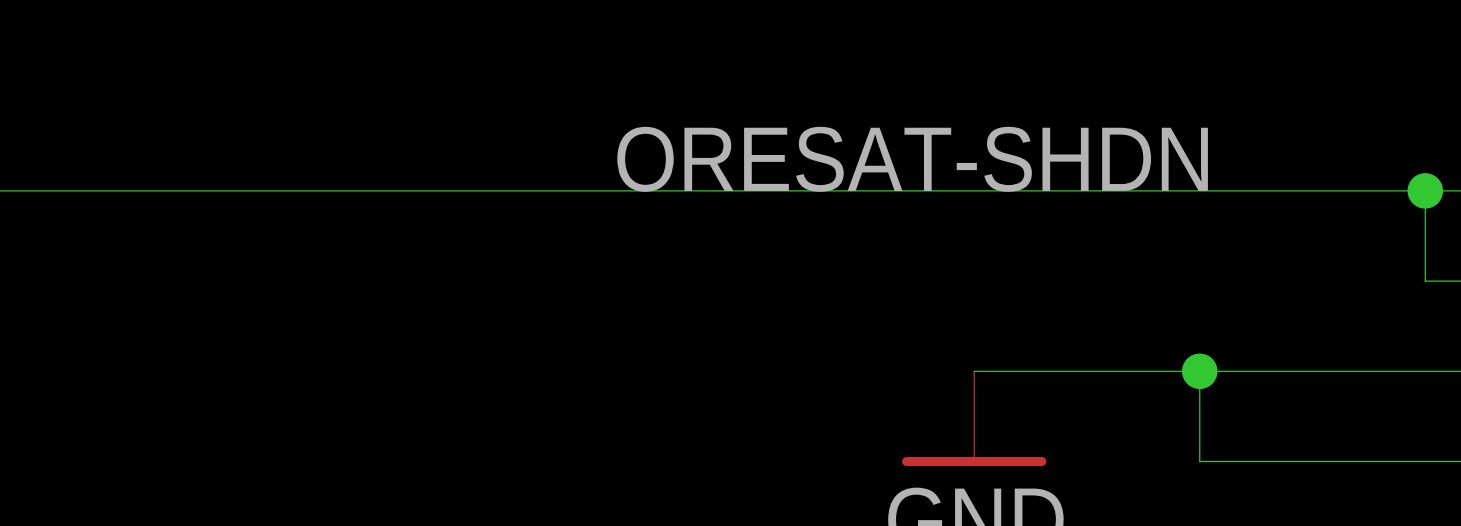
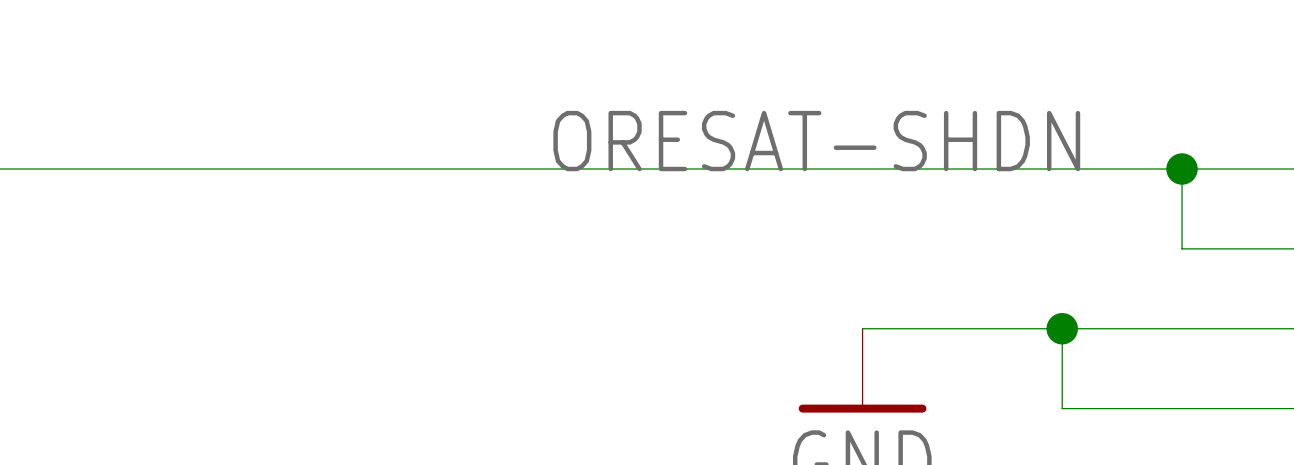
wire: (1425, 190) (1425, 281) -> (1182, 169) (1182, 248) (1261, 248)
junction position: (1425, 190) -> (1182, 169)

